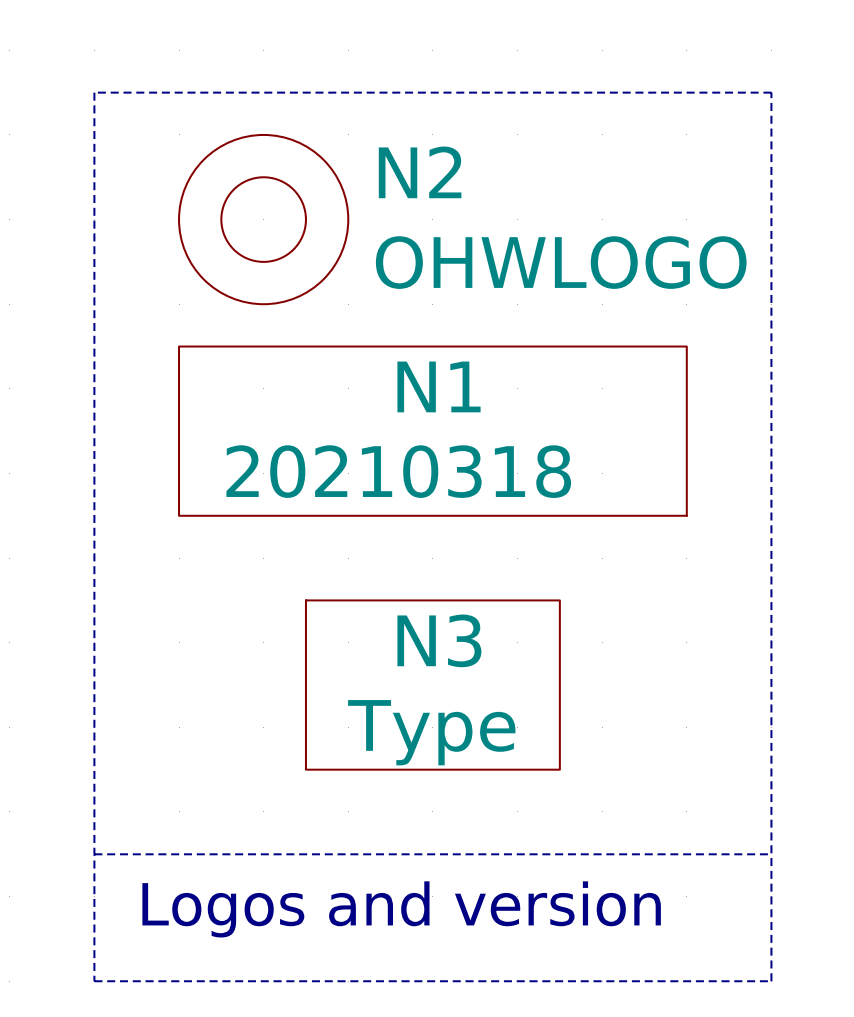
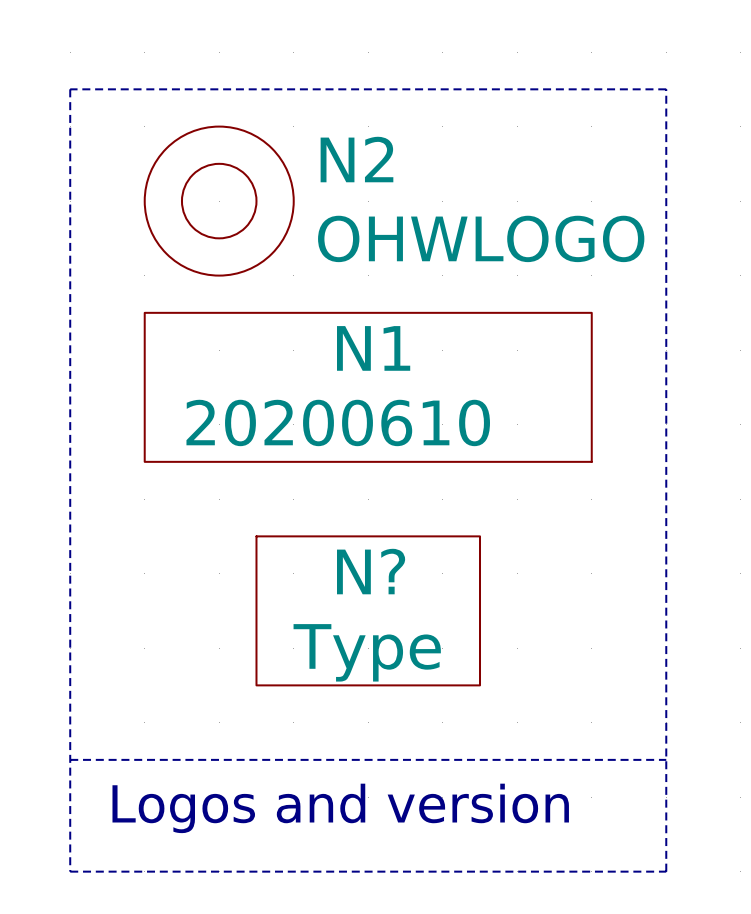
N1 value: 20210318 (398, 471) -> 20200610 (338, 422)
N3 name: N3 (439, 640) -> N? (371, 571)

